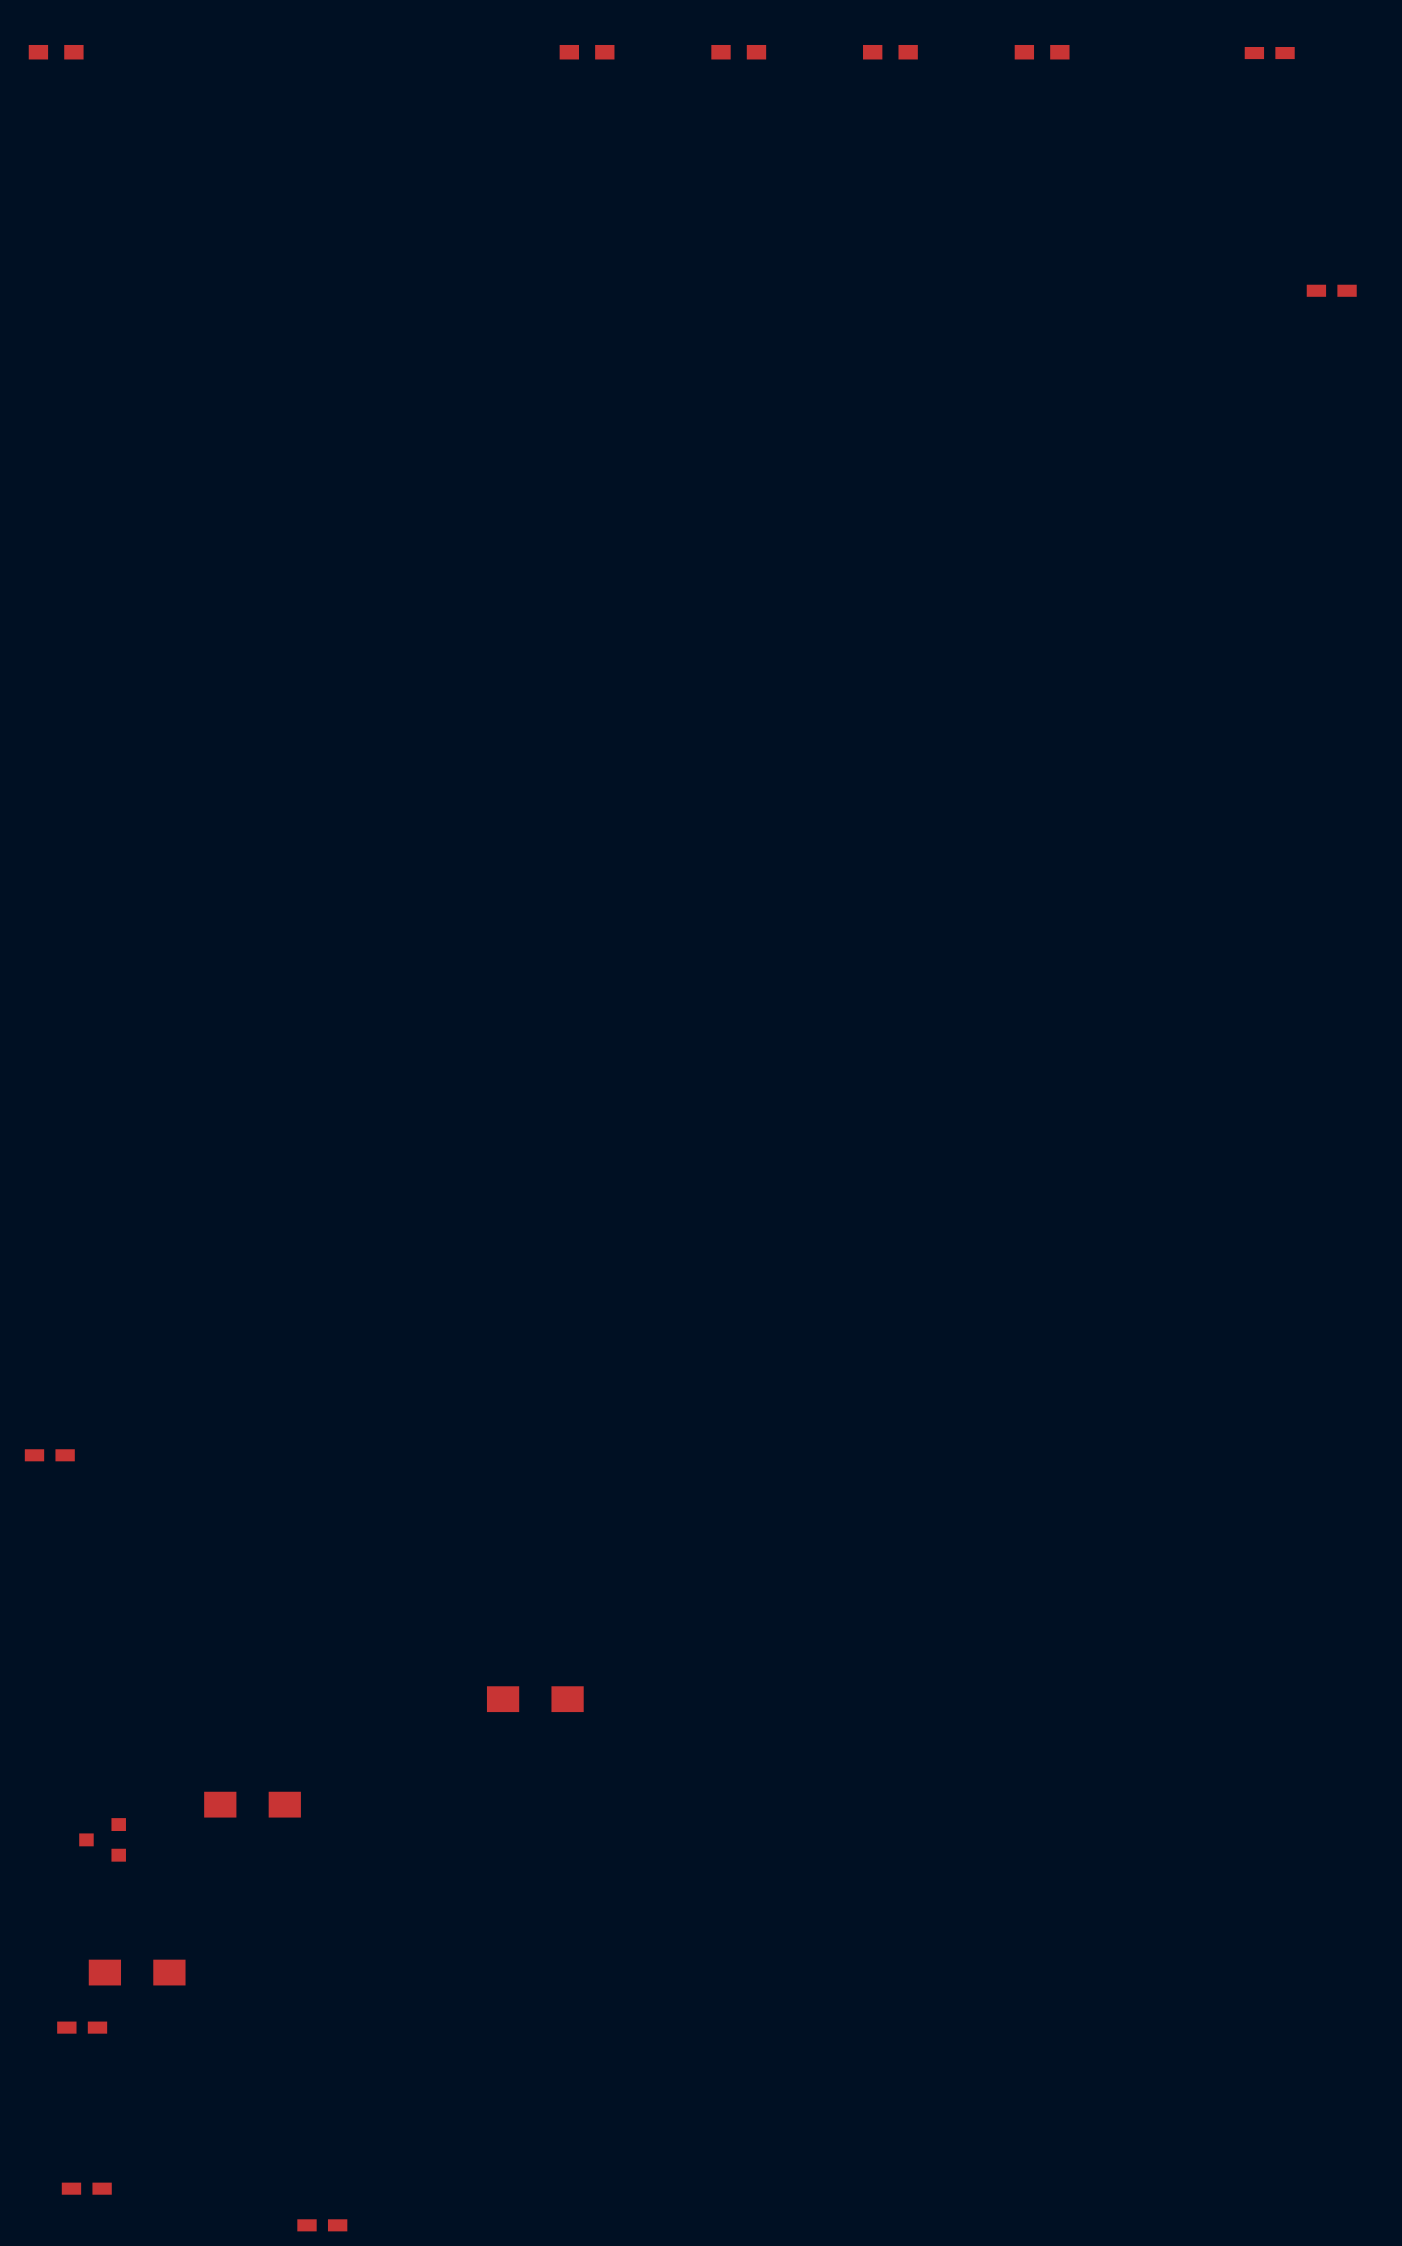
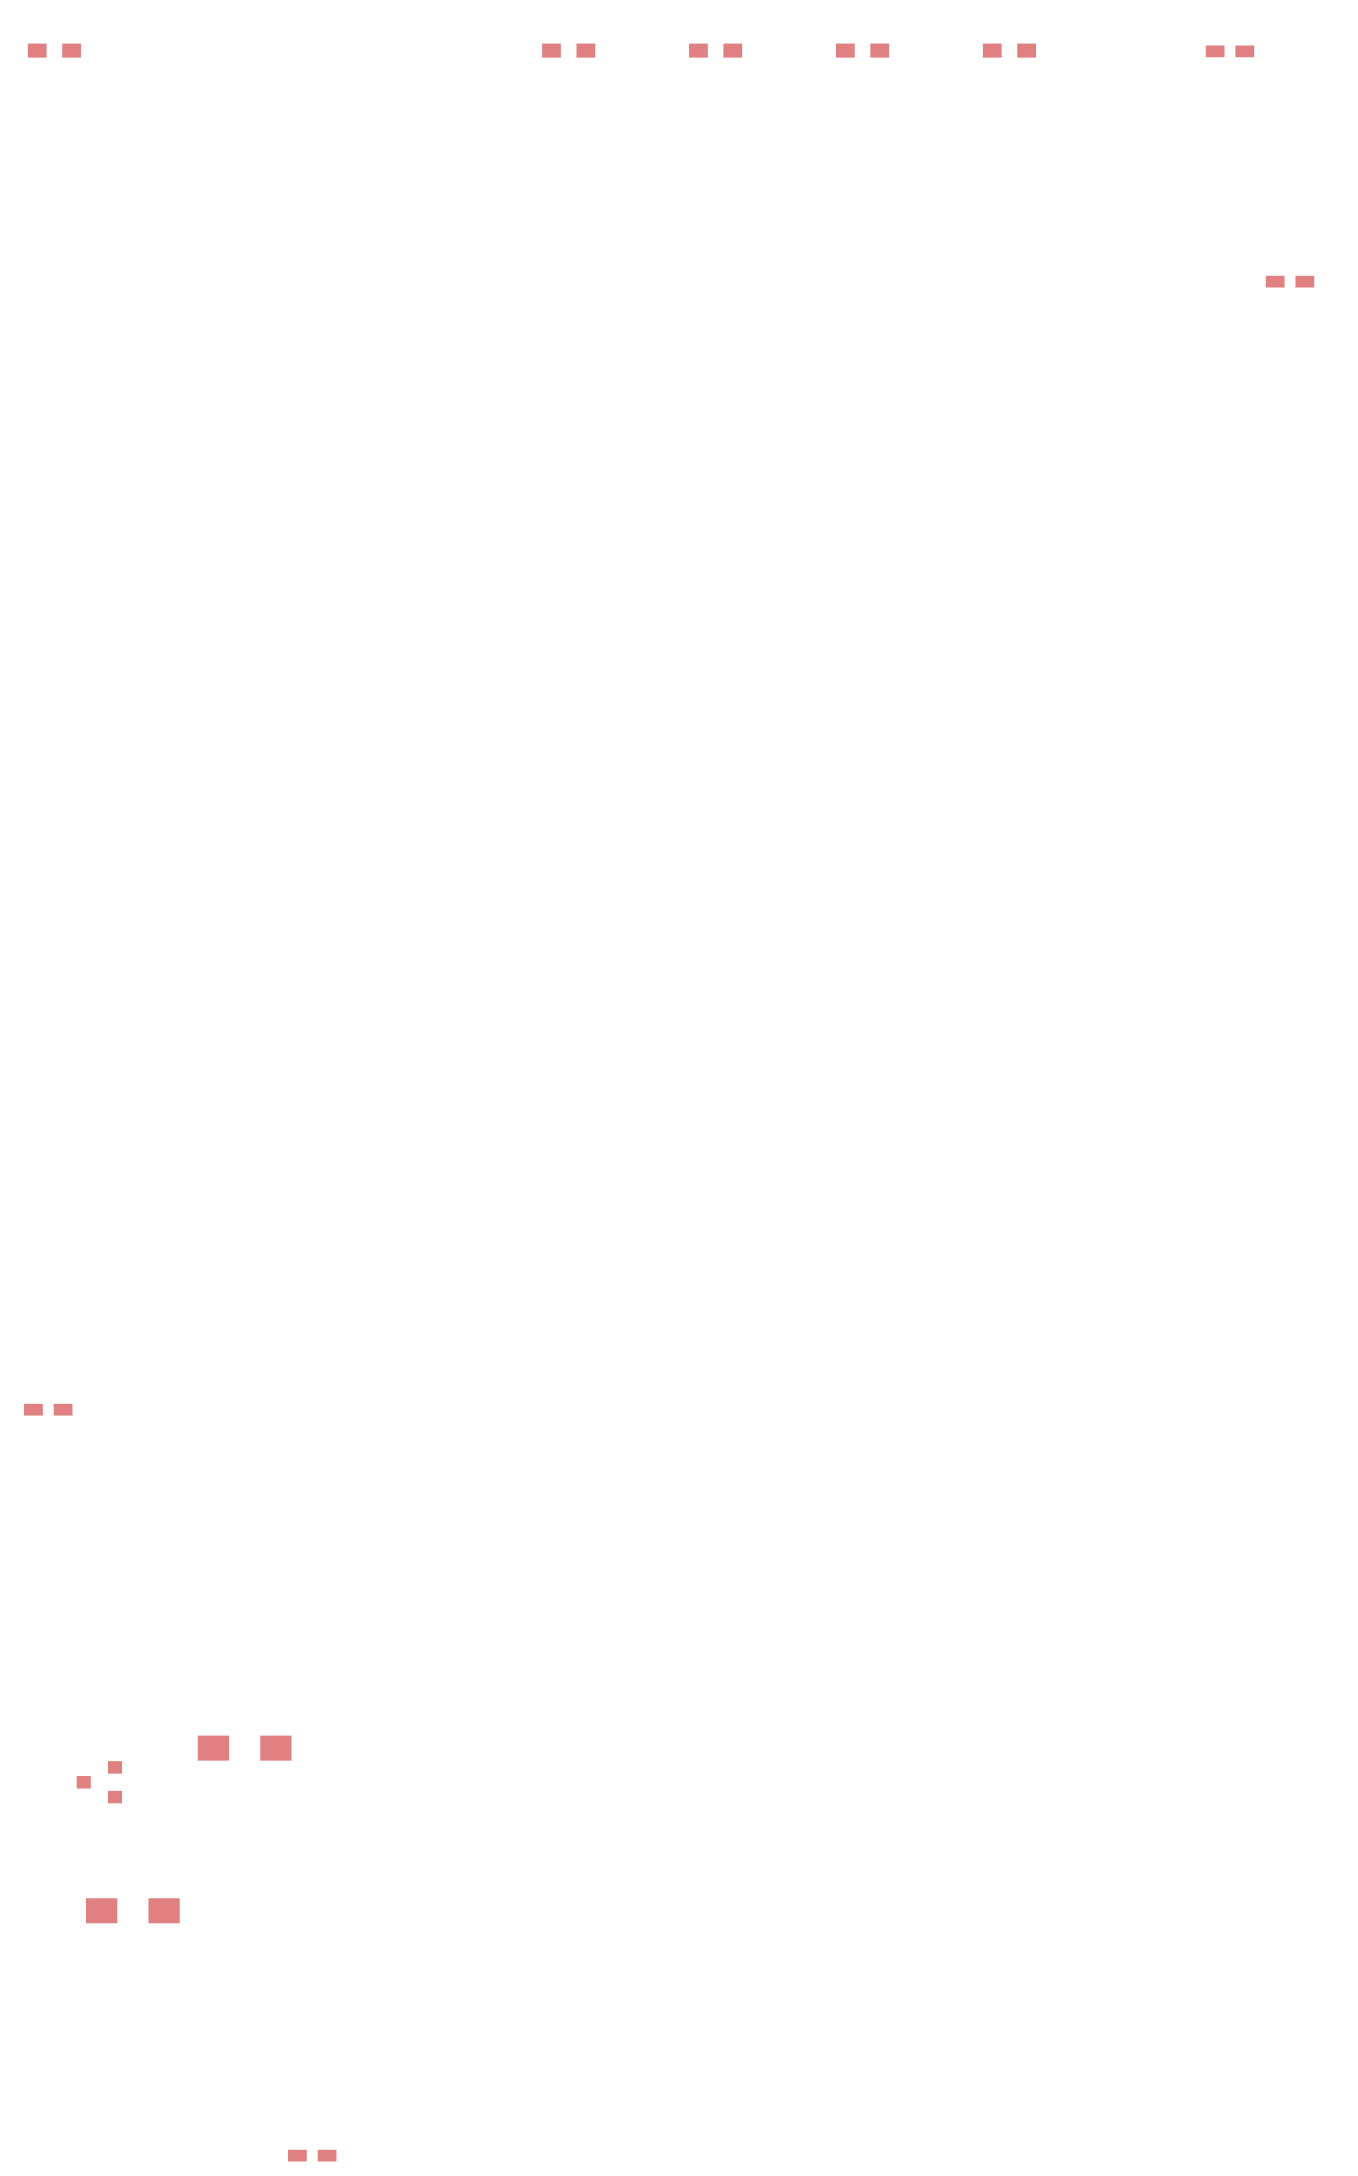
part: (535, 1699) -> none
part: (82, 2027) -> none
part: (86, 2188) -> none

